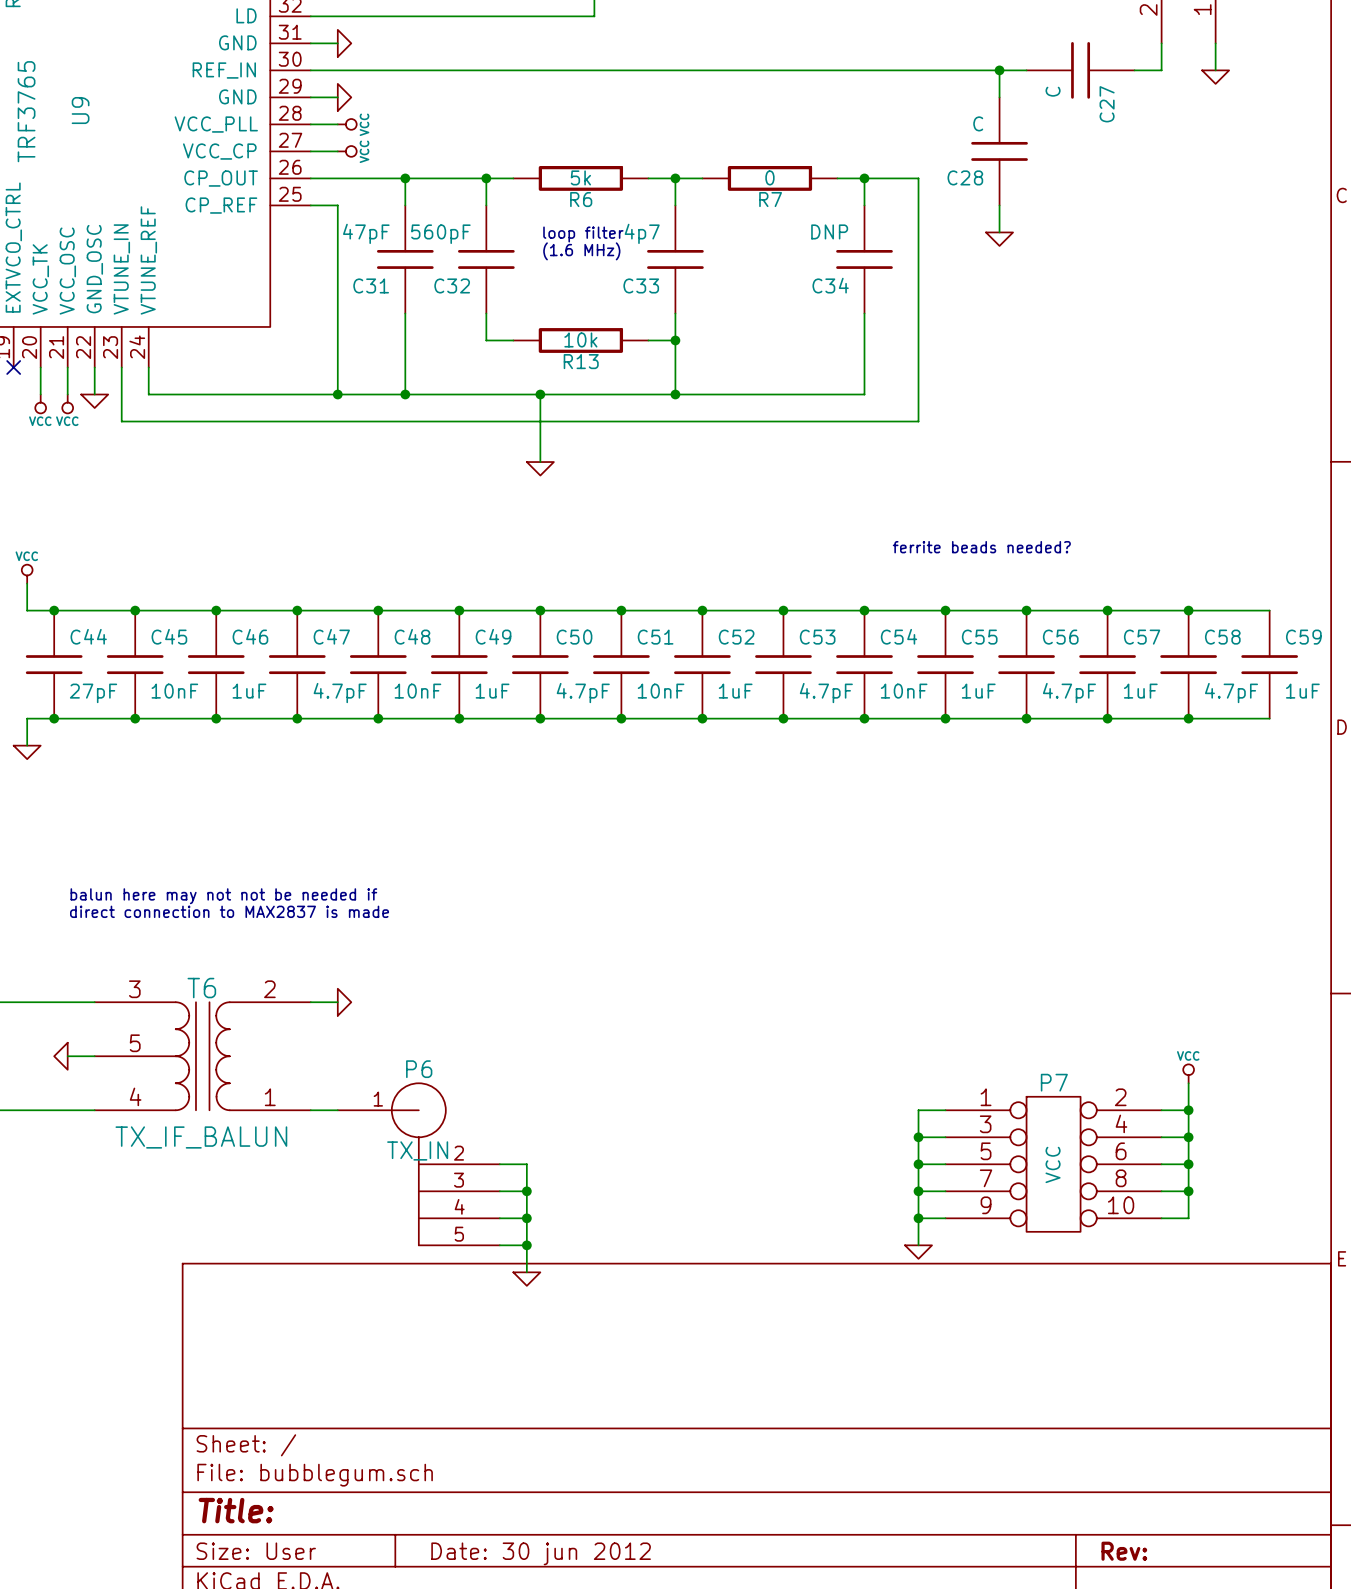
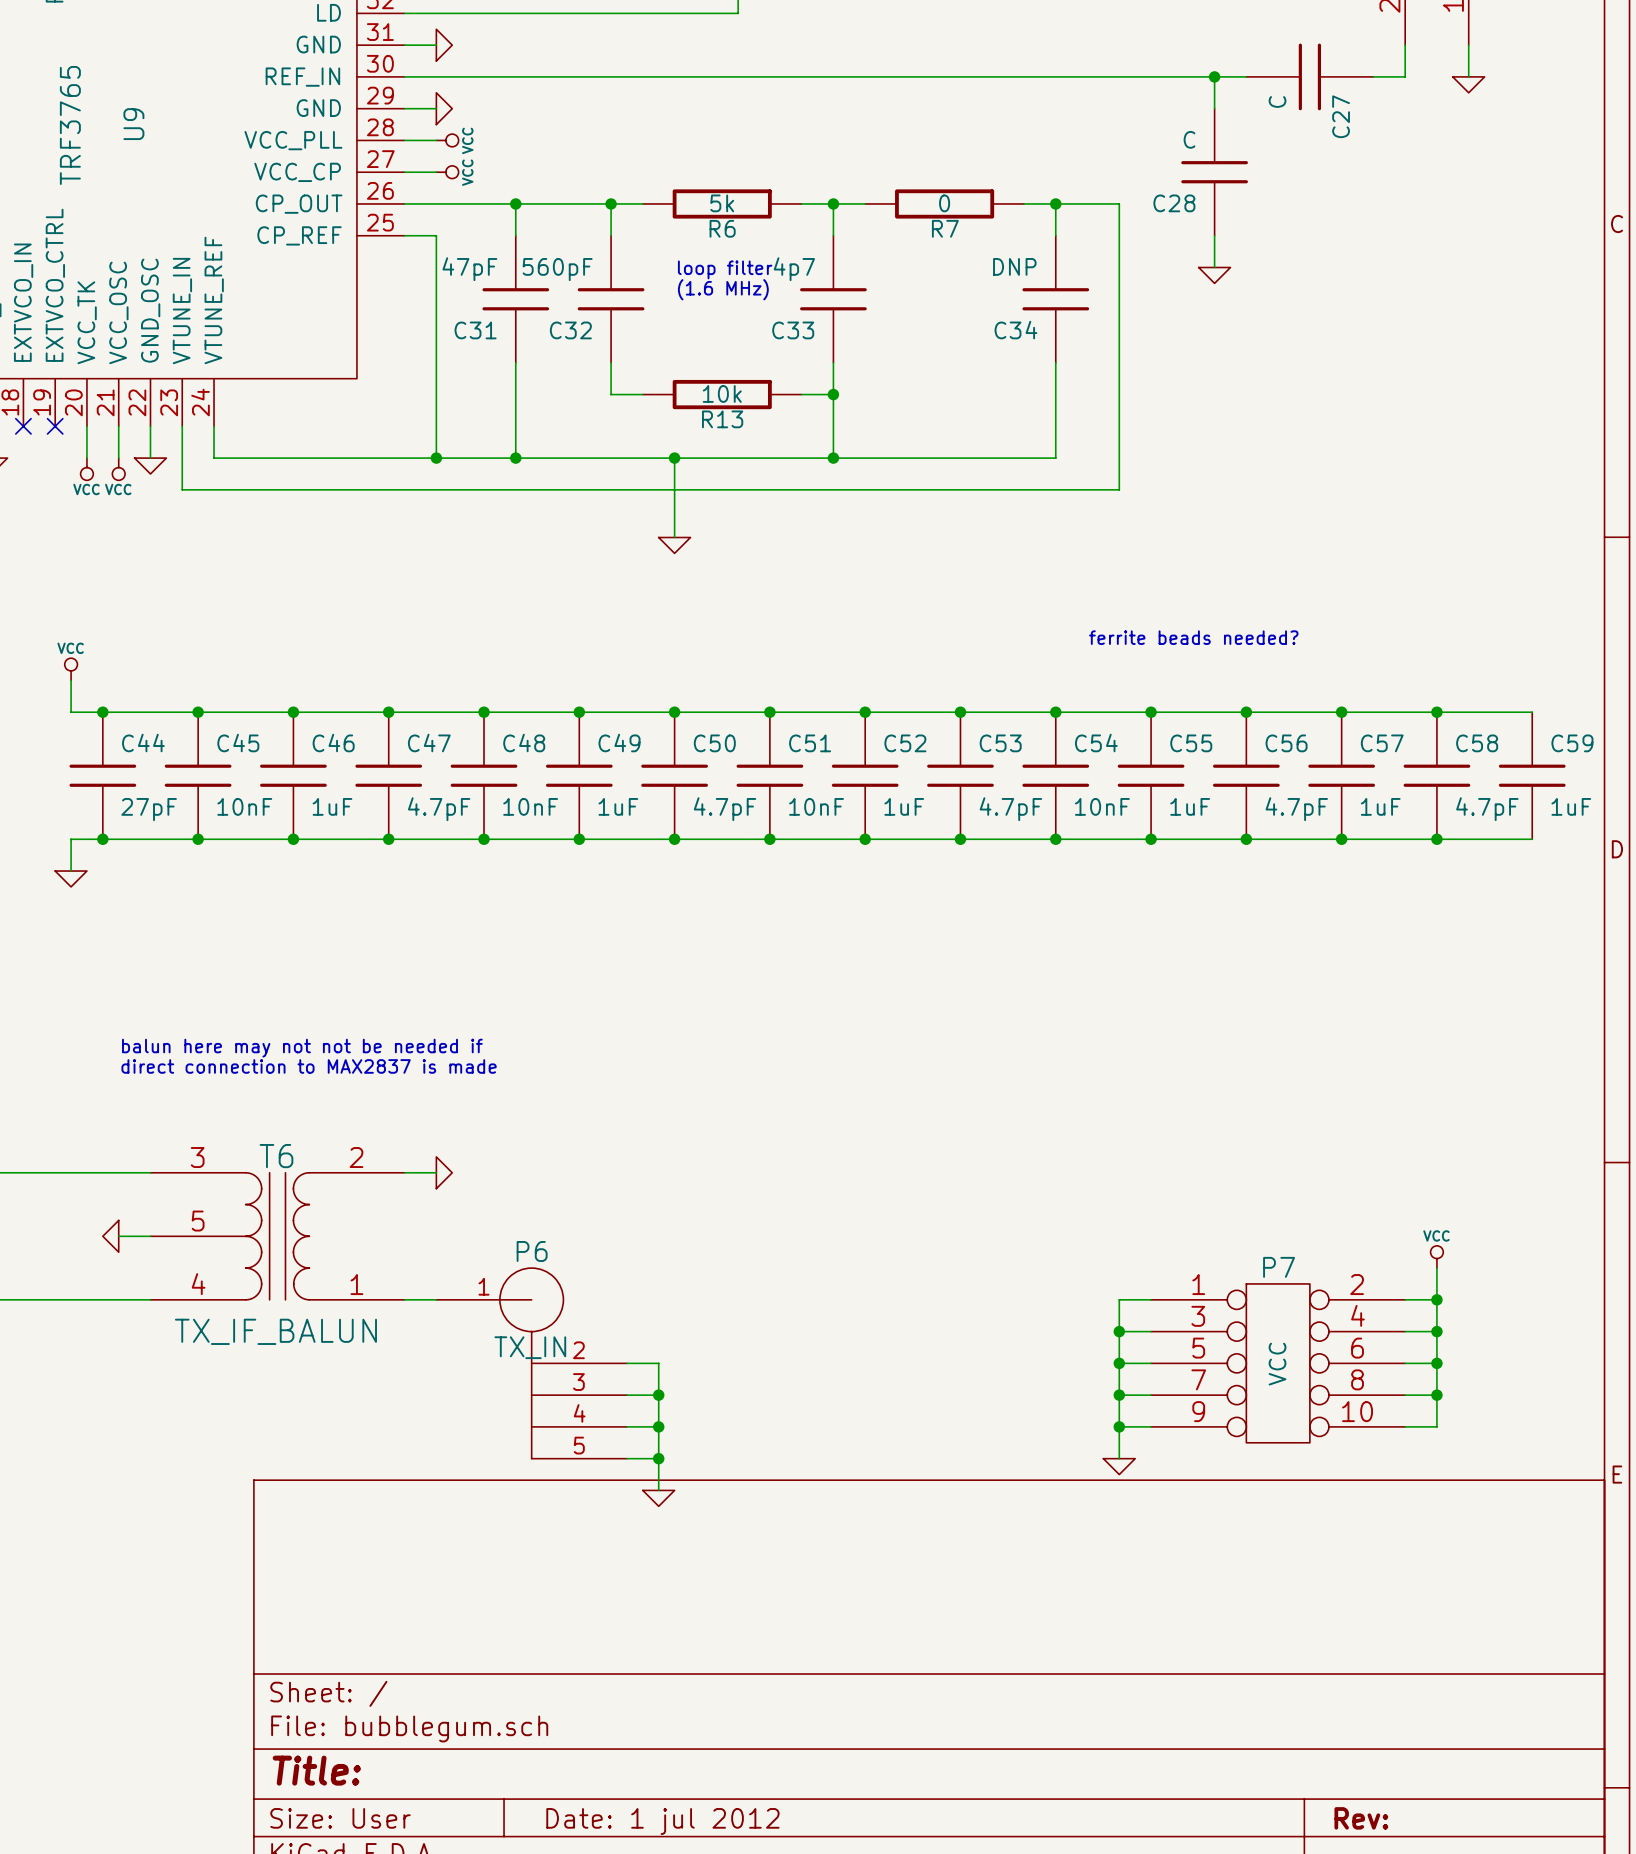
title block: Date: 30 jun 2012 (541, 1553) -> Date: 1 jul 2012 (662, 1821)

